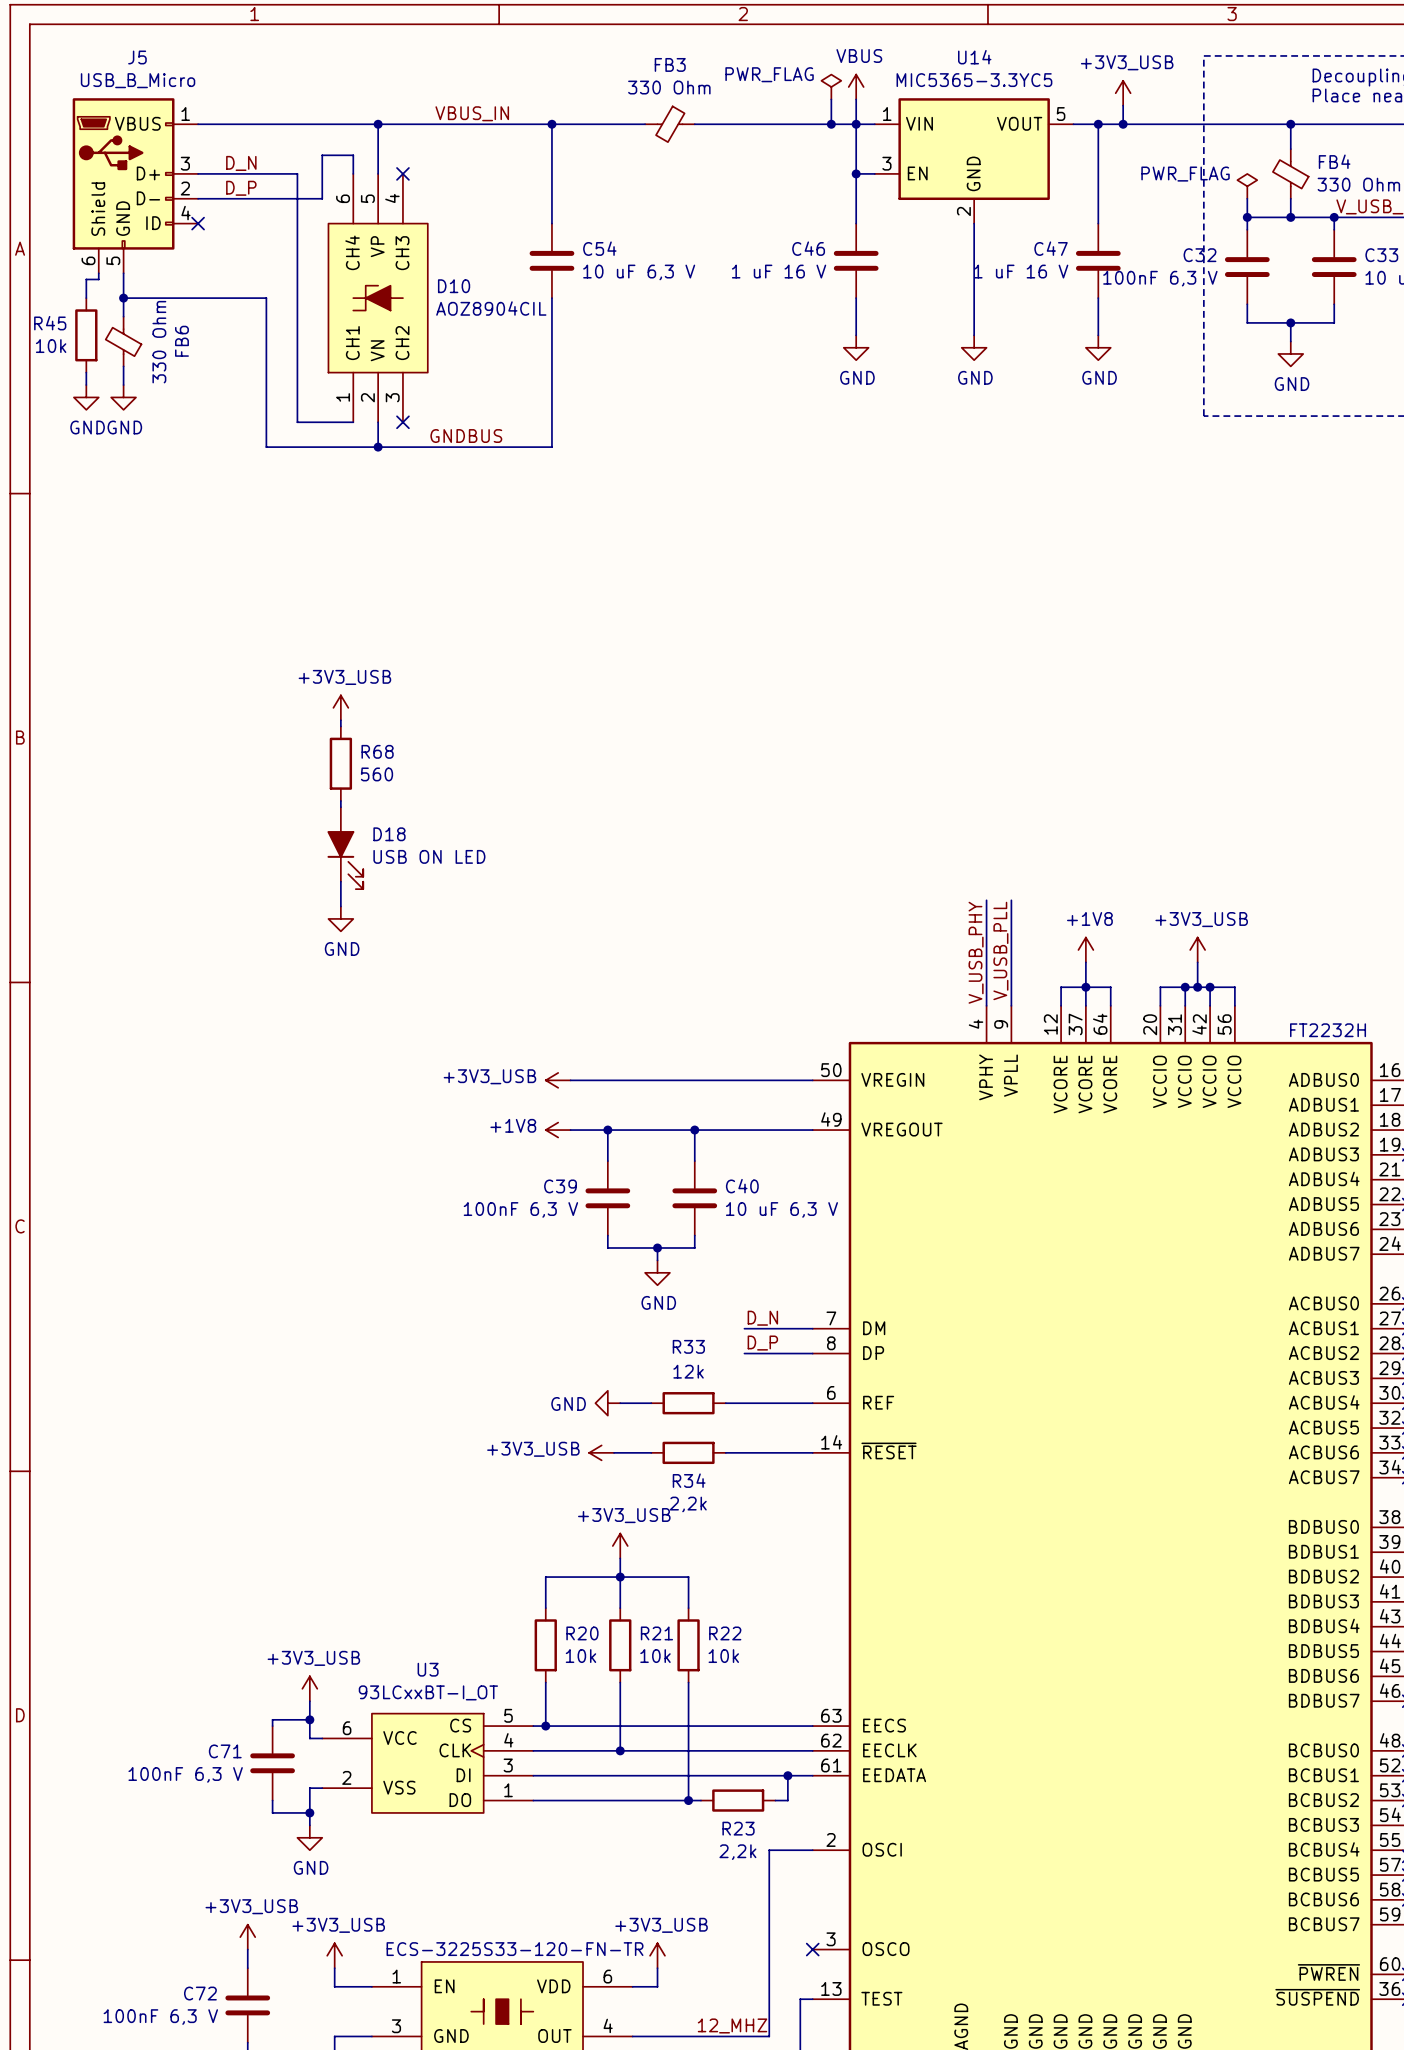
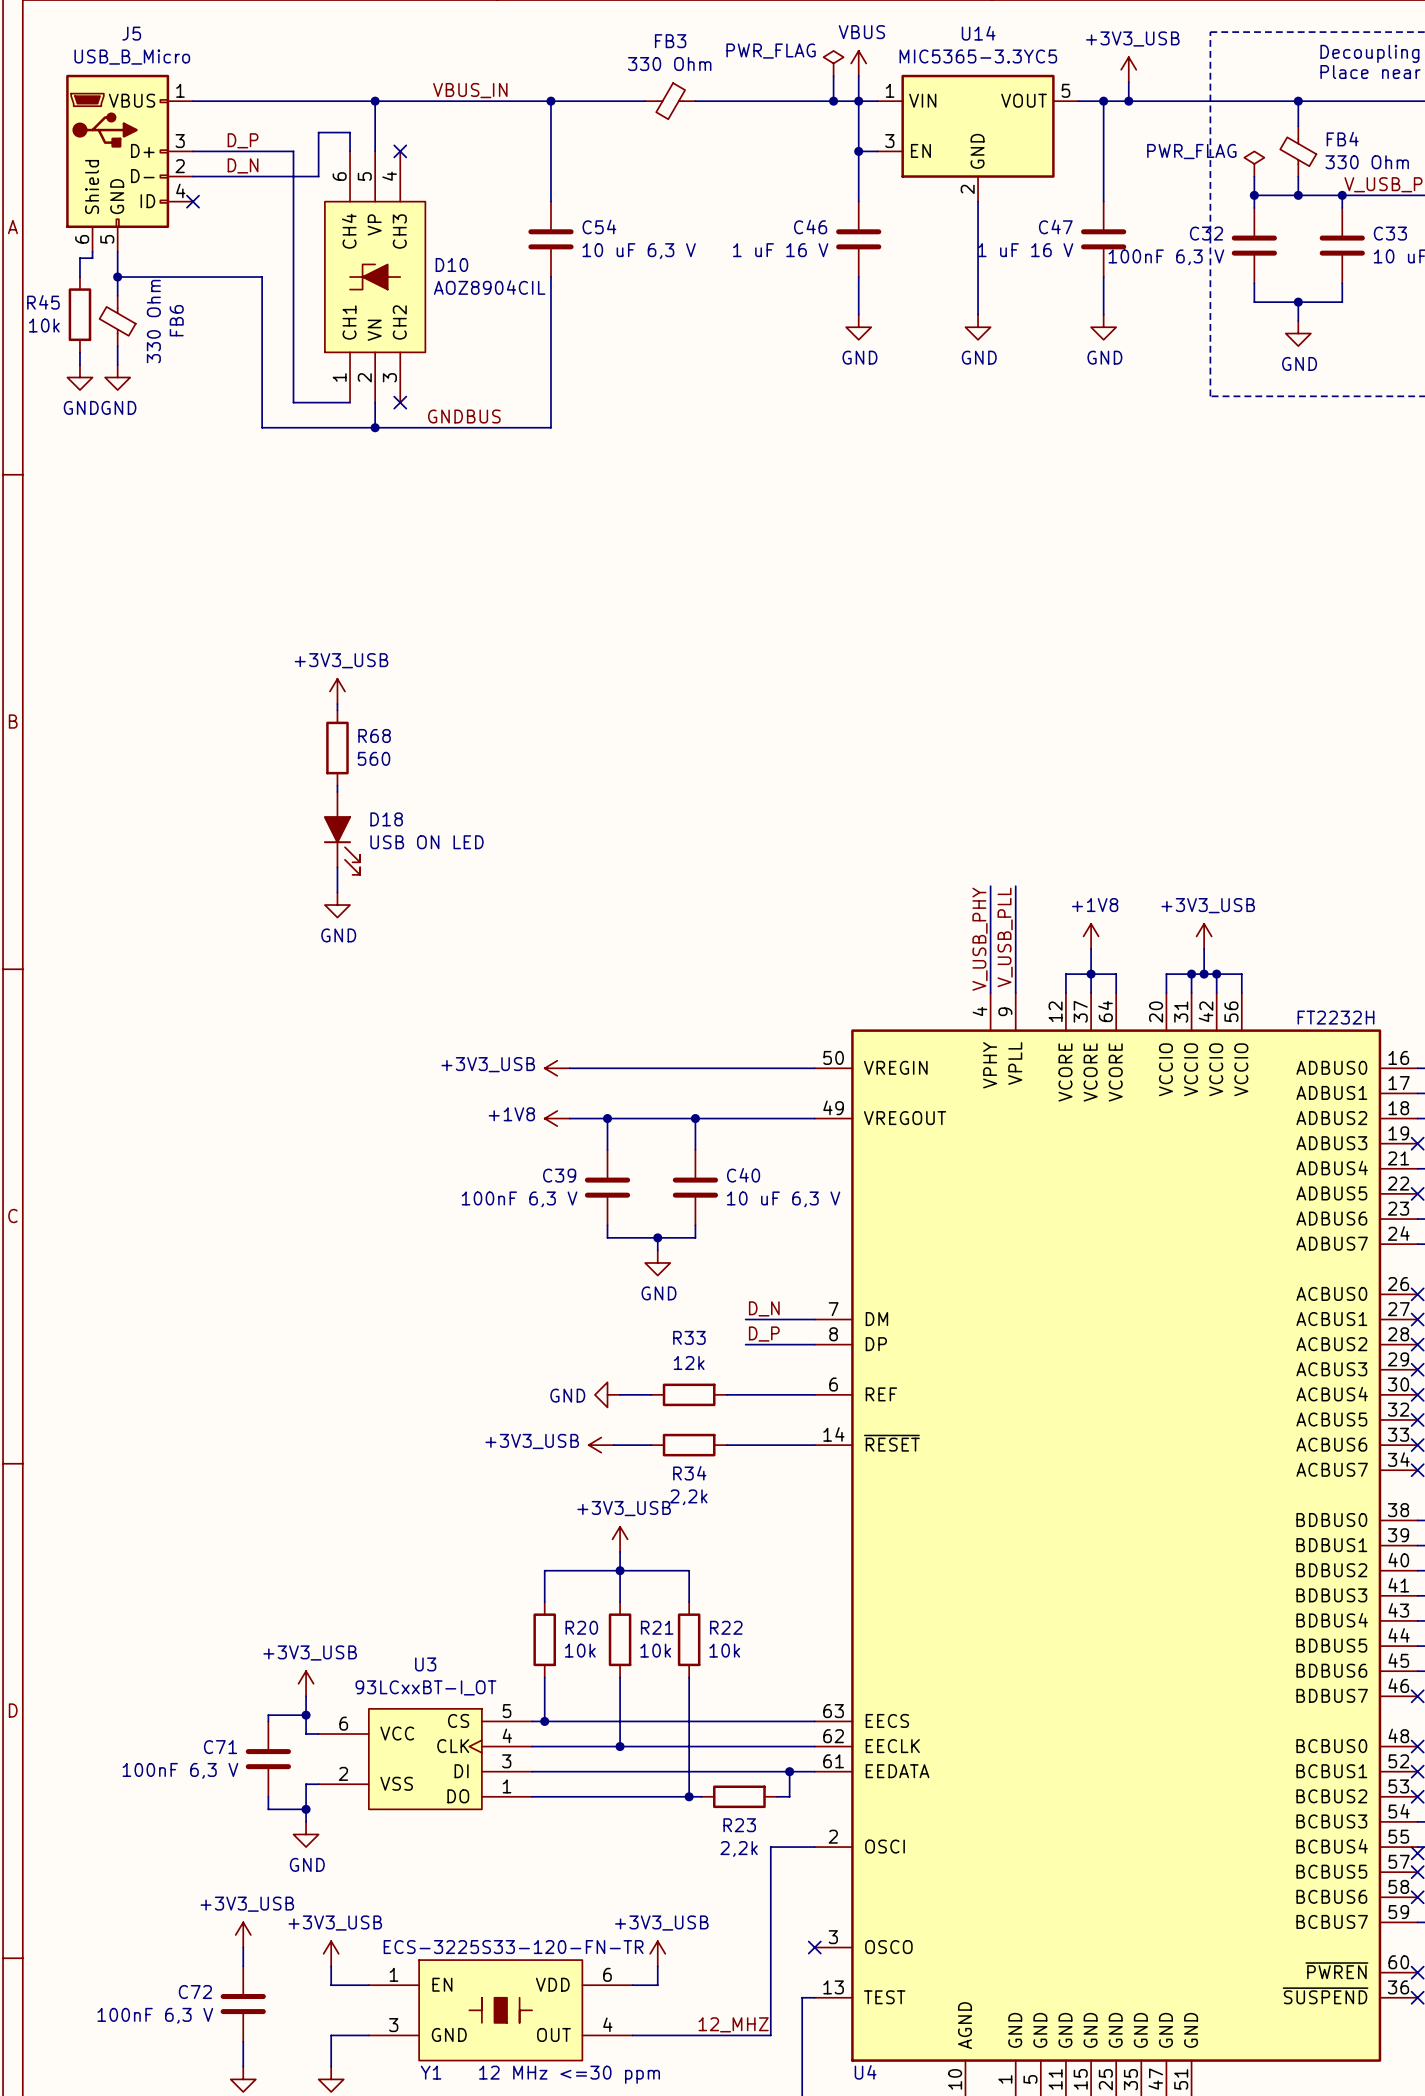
label: D_N (241, 163) -> D_P (243, 140)
label: D_P (241, 188) -> D_N (243, 165)

